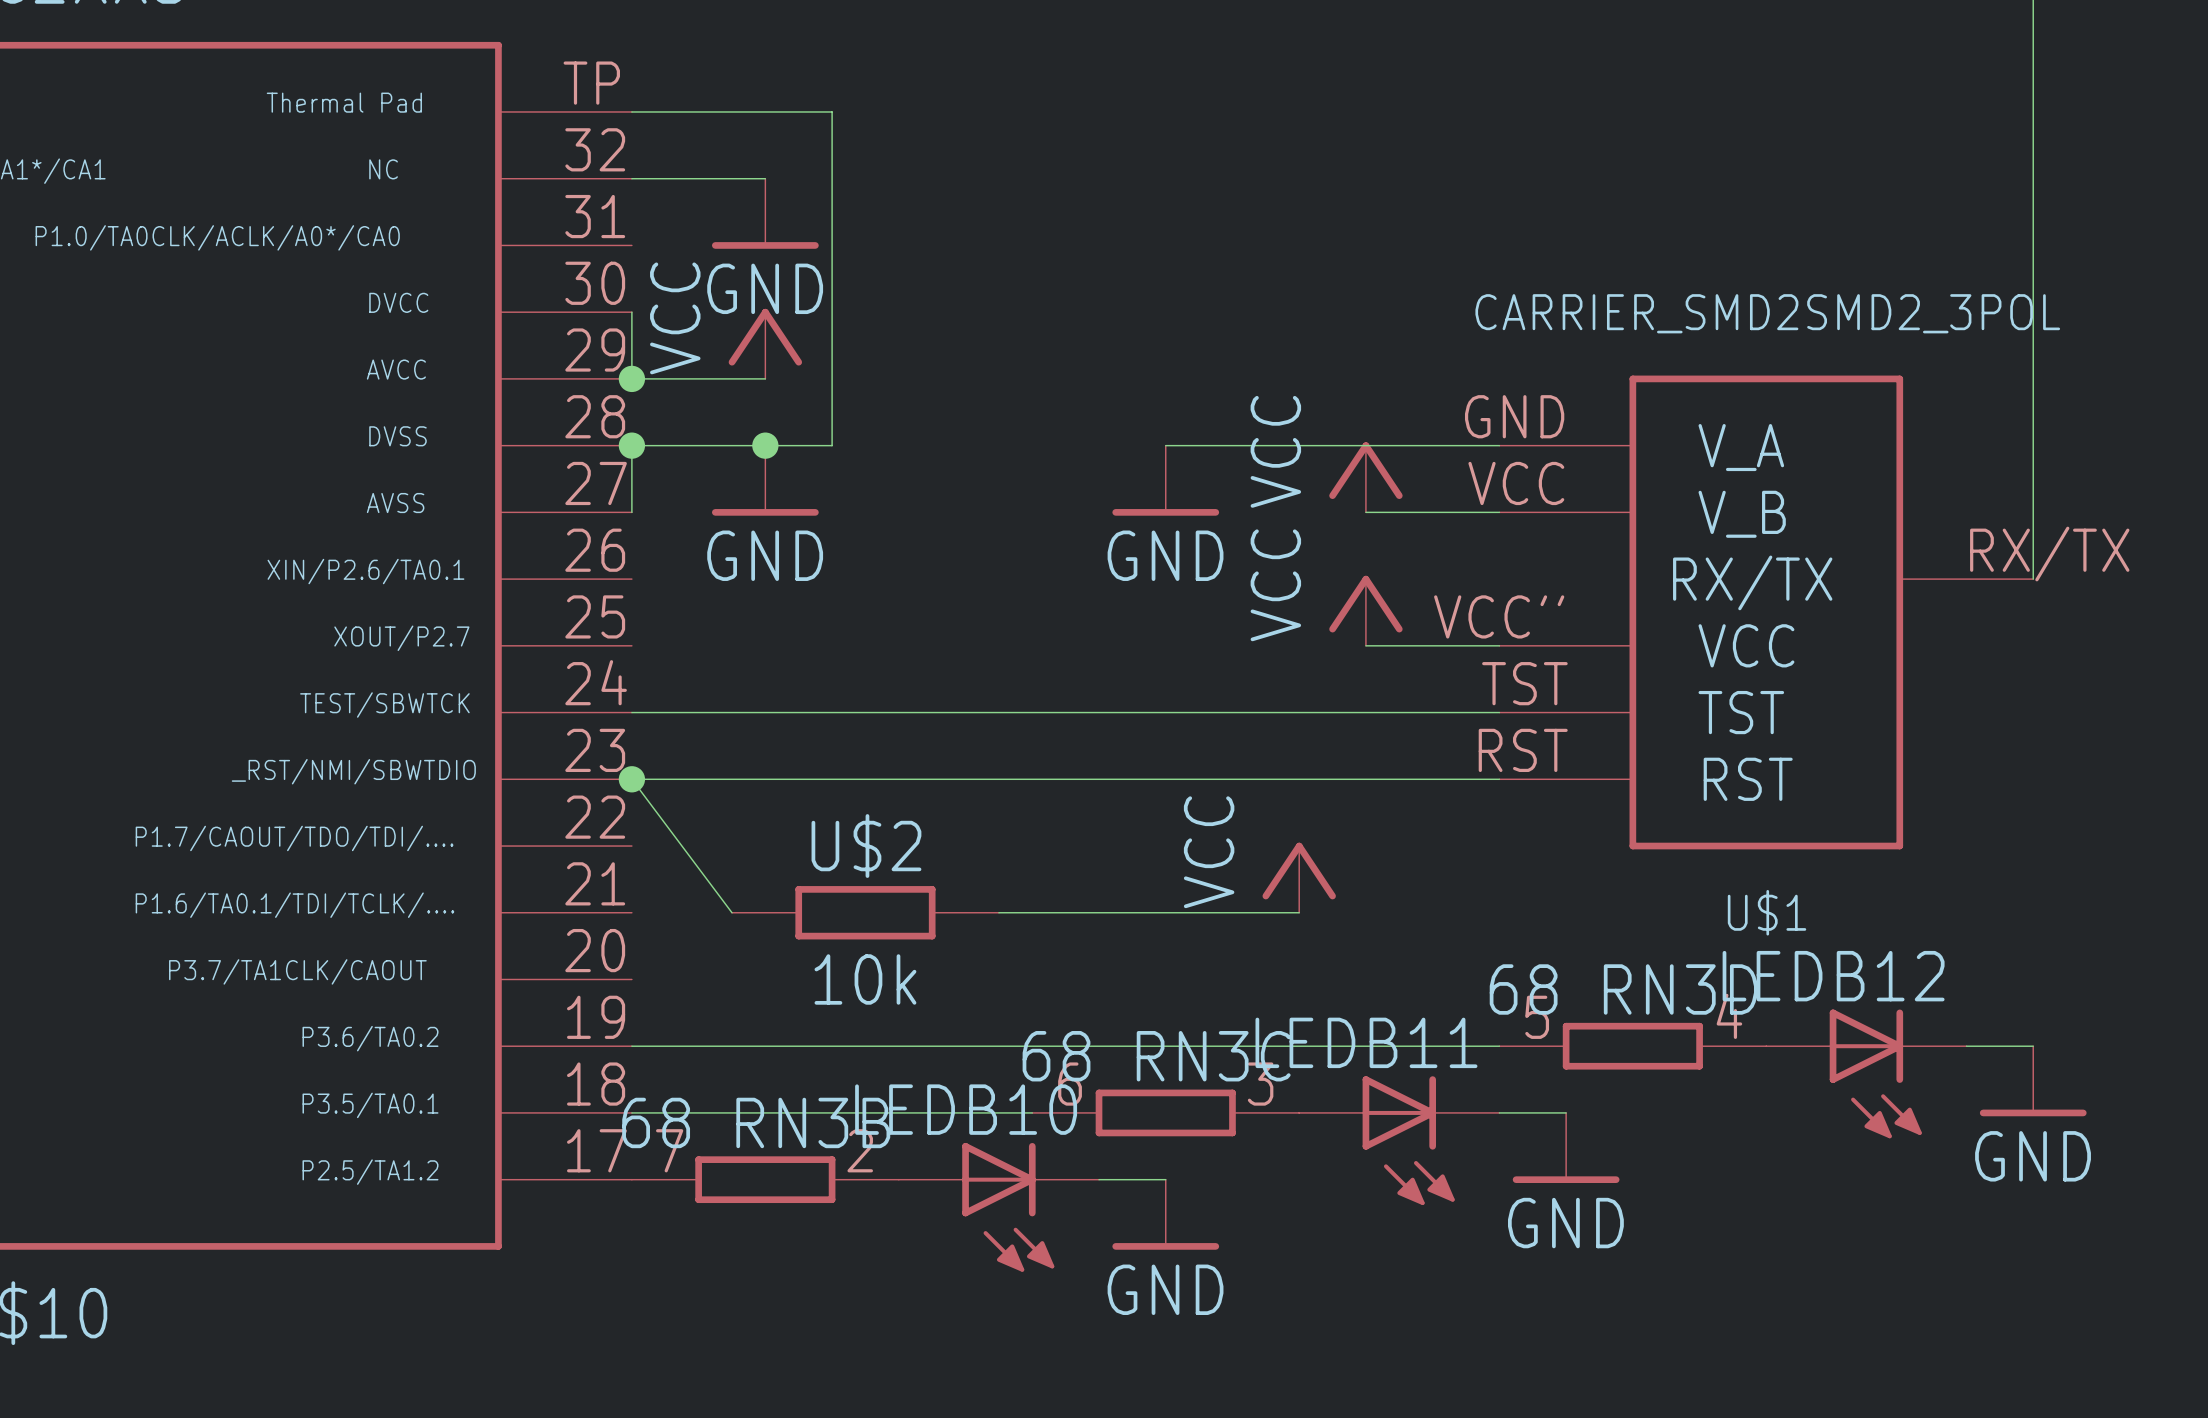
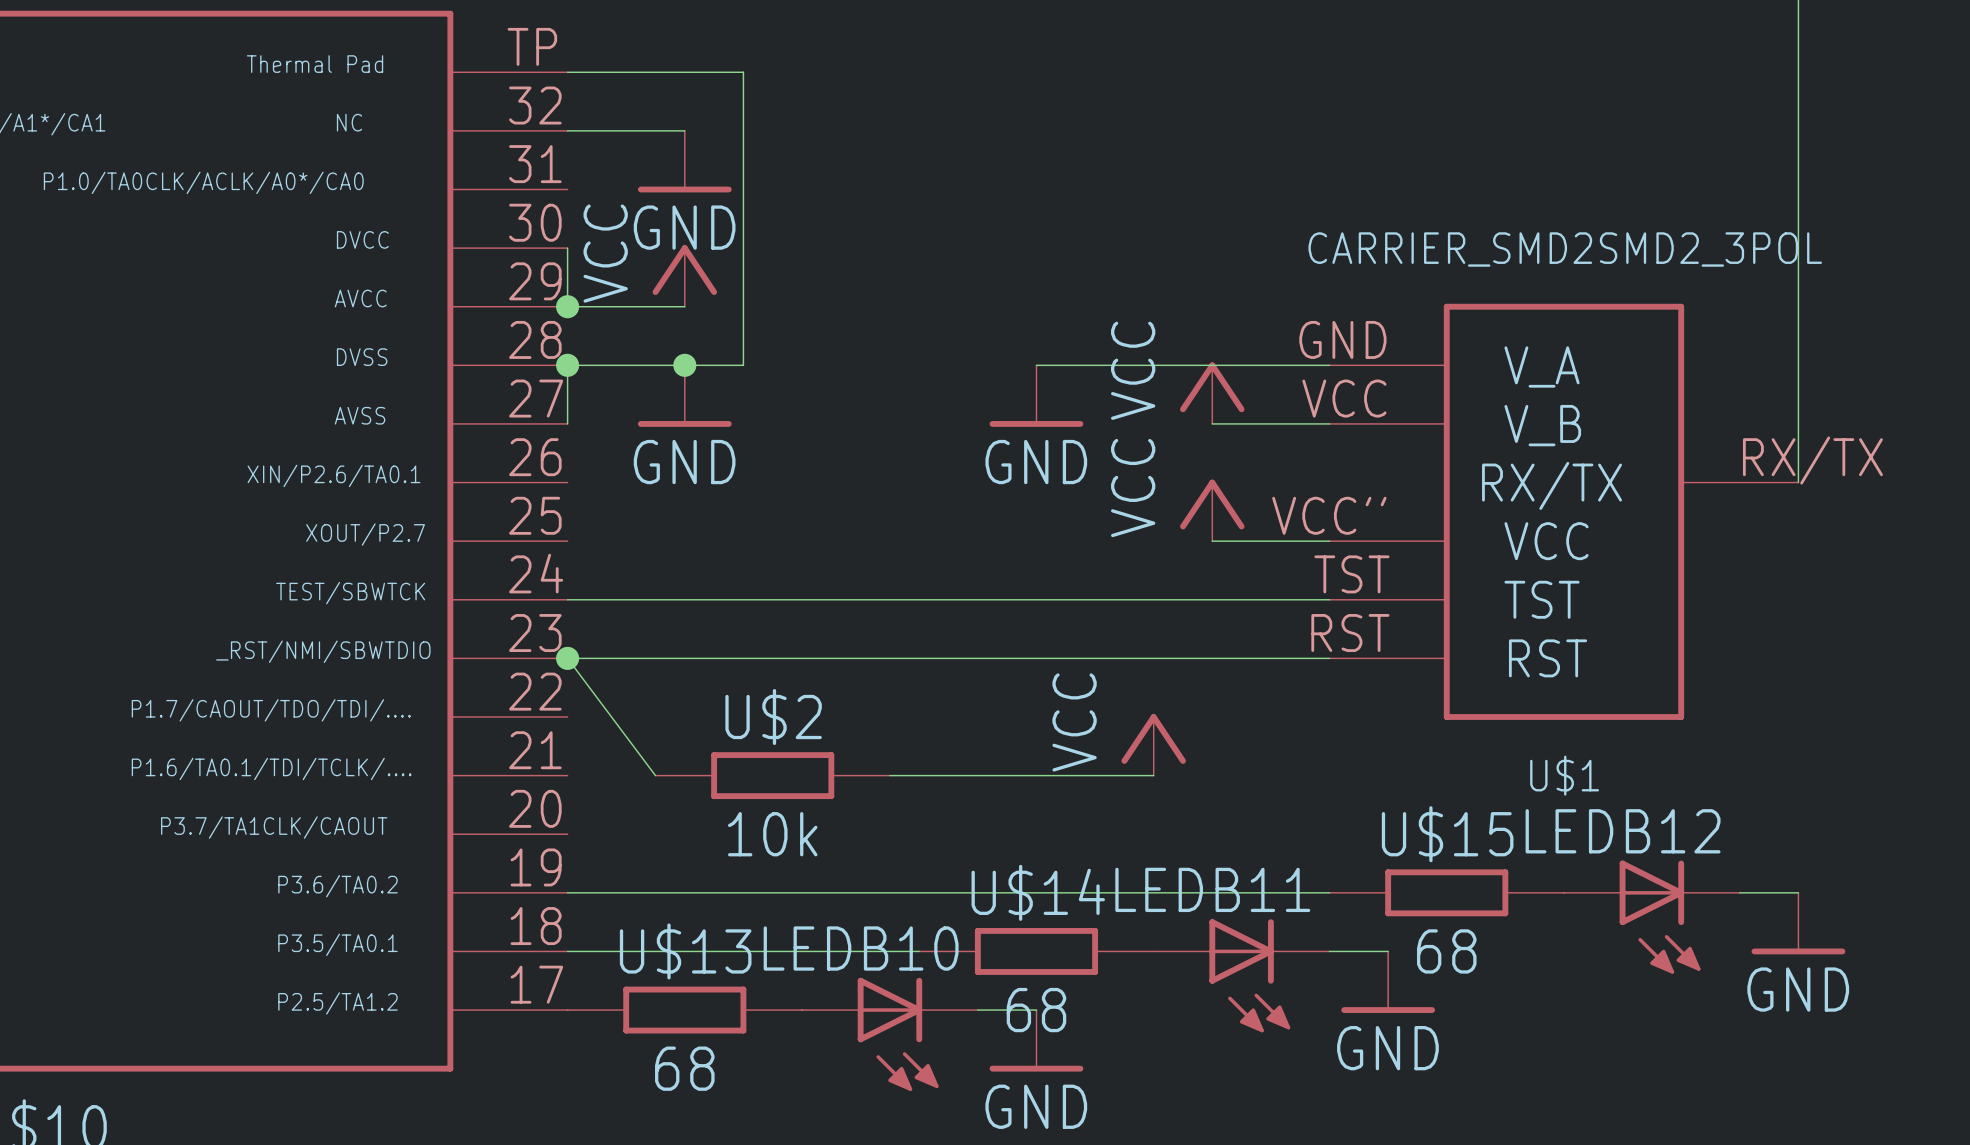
RN3D: 68 (1632, 1046) -> none
U$15: none -> 68 (1446, 892)
RN3C: 68 (1165, 1112) -> none
U$14: none -> 68 (1036, 951)
RN3B: 68 (765, 1179) -> none
U$13: none -> 68 (684, 1010)

